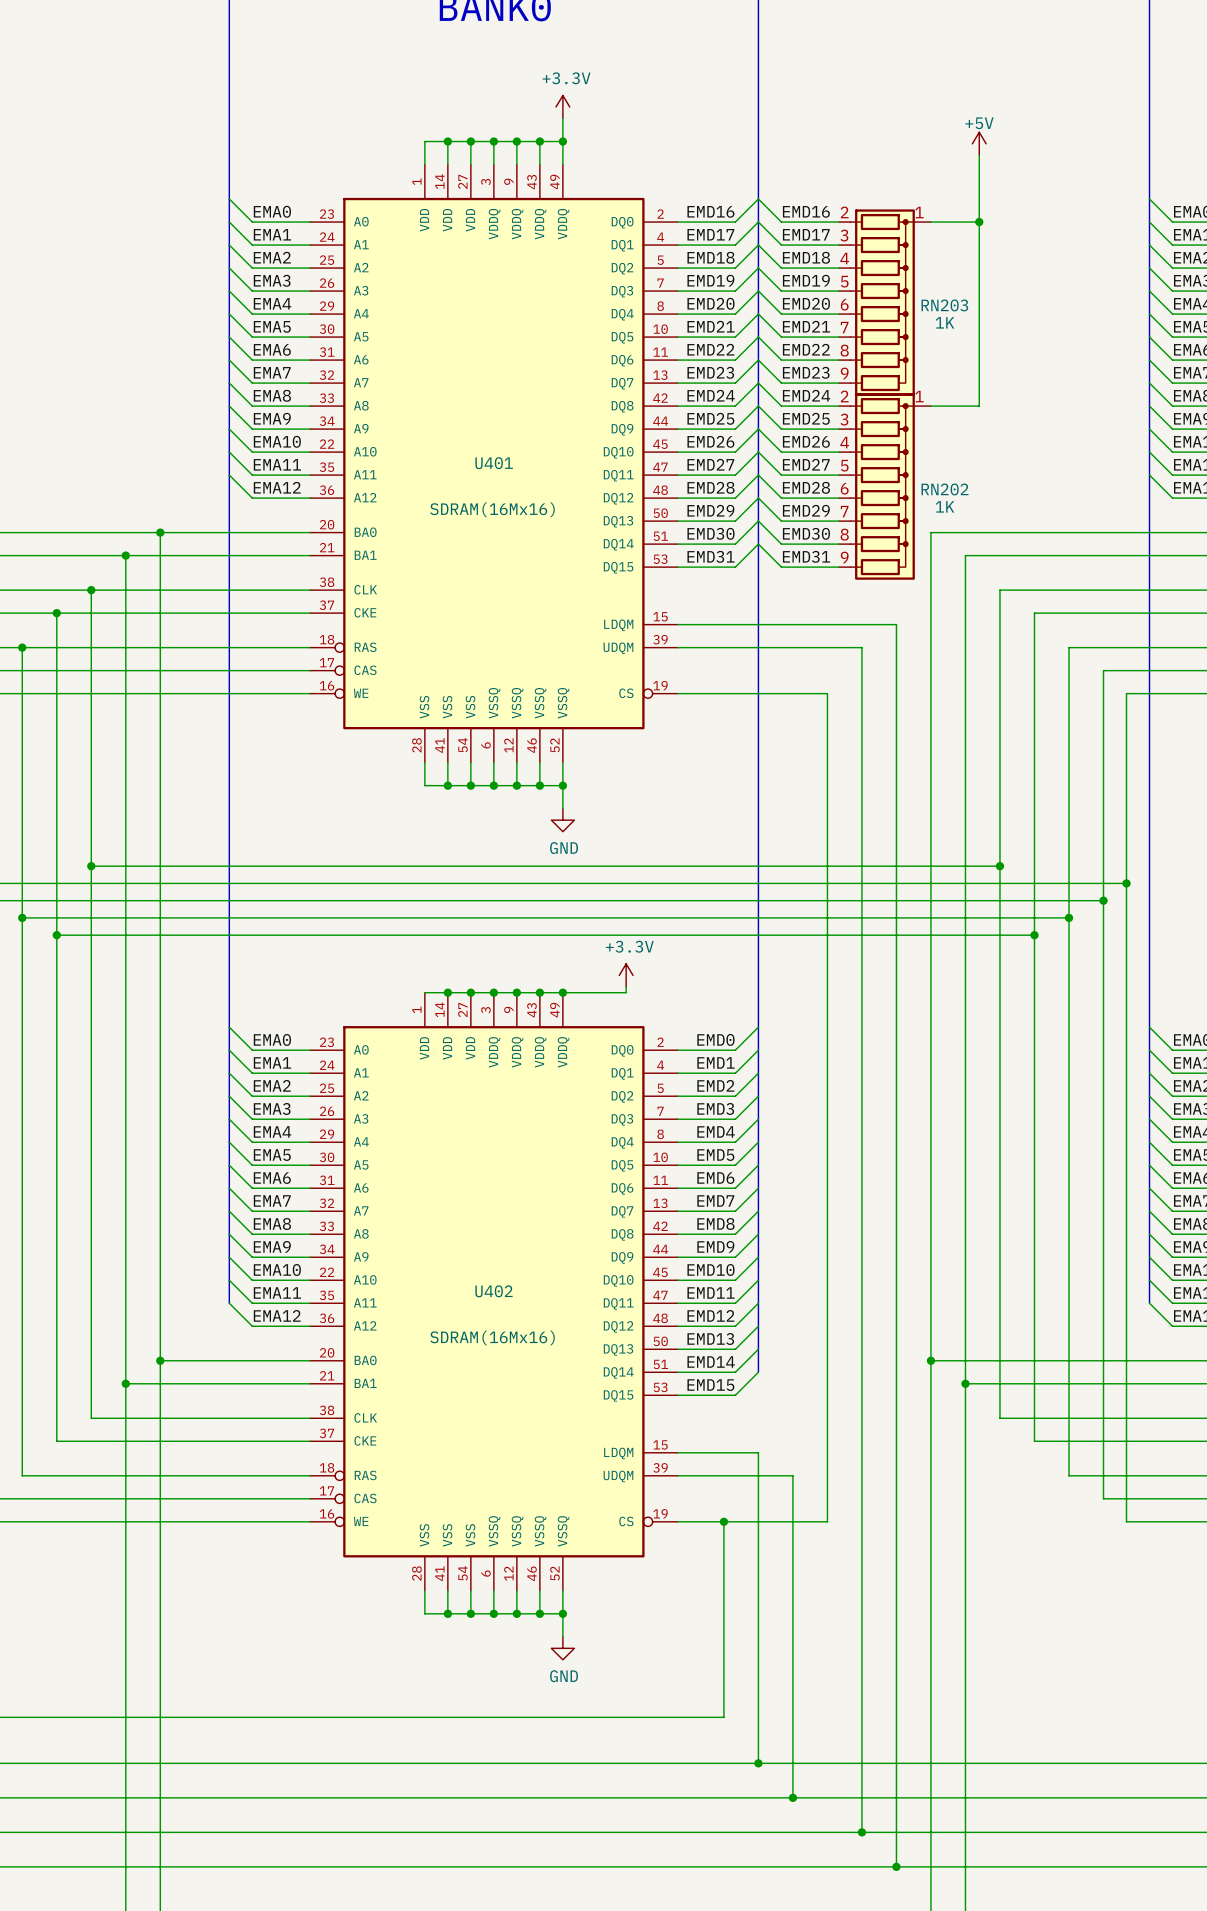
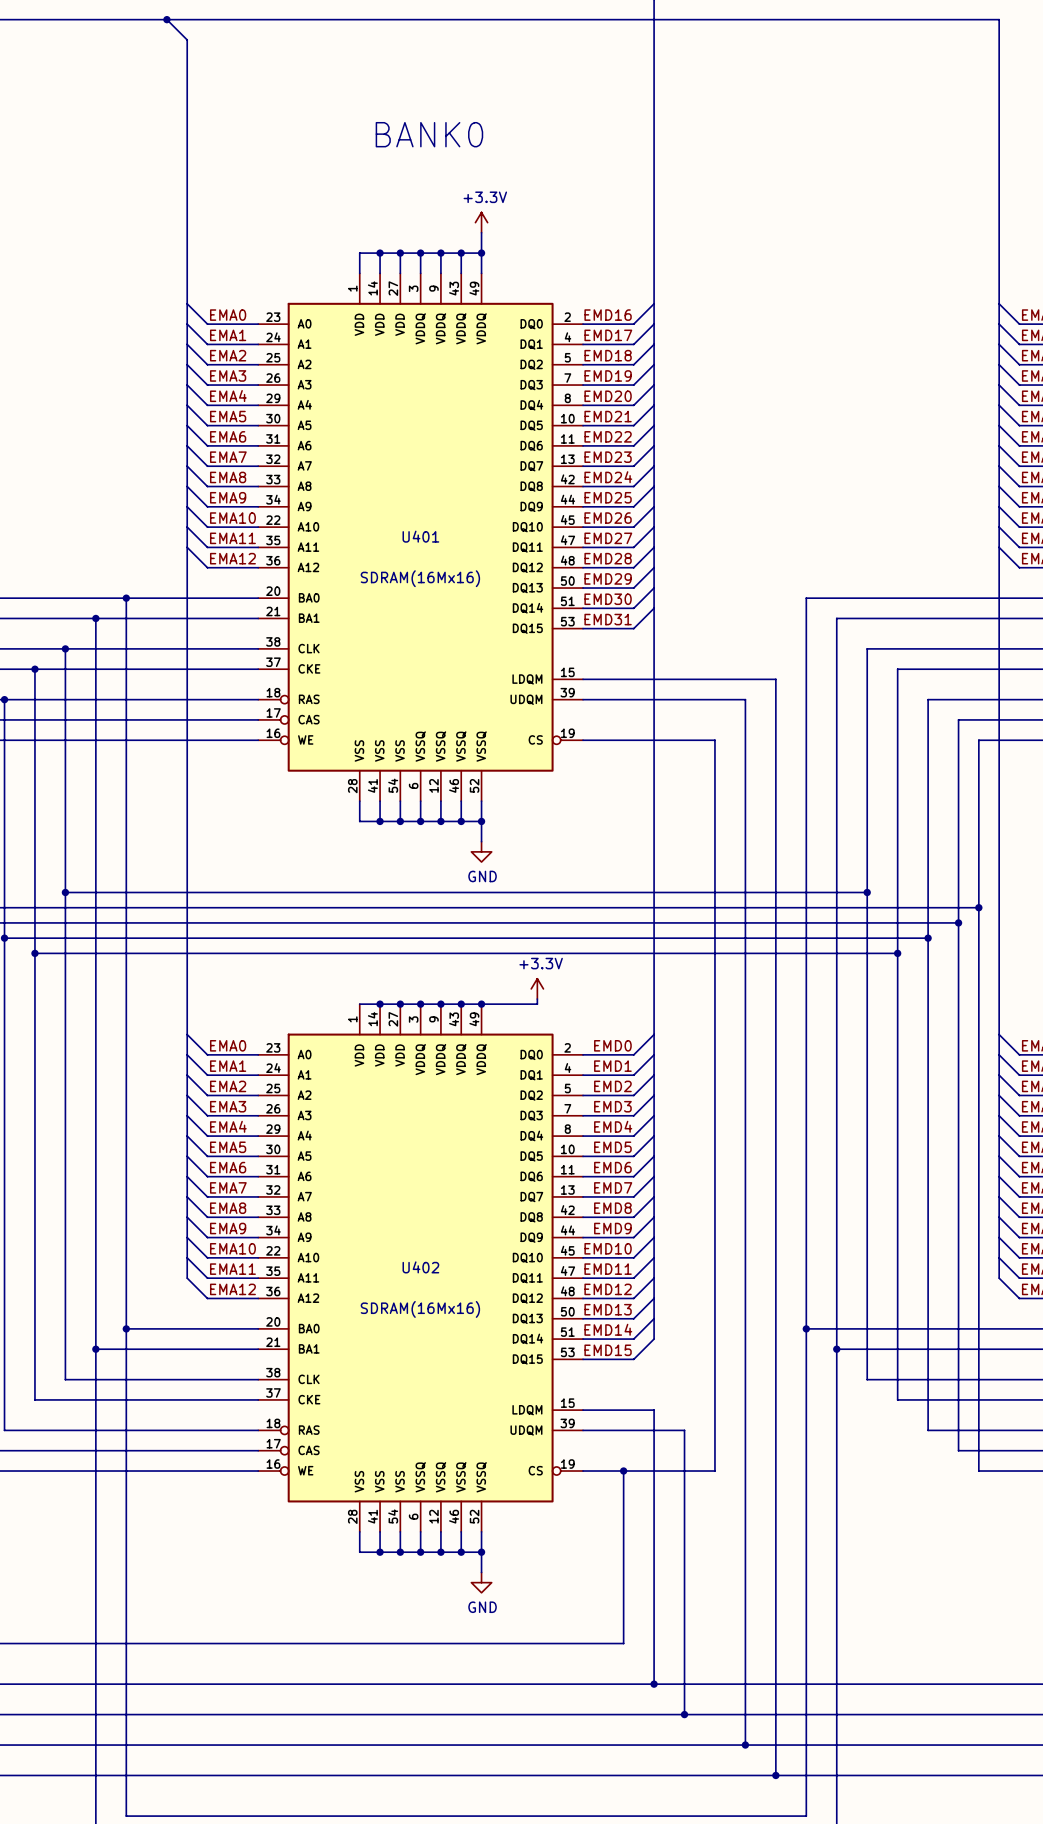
power symbol: +5V (979, 143) -> none
wire: (979, 155) (979, 406) (930, 406) -> none
wire: (758, 199) (781, 222) (838, 222) -> none
label: EMD16 (806, 211) -> none
wire: (758, 222) (781, 245) (838, 245) -> none
wire: (930, 222) (979, 222) -> none
junction: (979, 222) -> none
label: EMD17 (806, 234) -> none
wire: (758, 245) (781, 268) (838, 268) -> none
label: EMD18 (806, 257) -> none
wire: (758, 268) (781, 291) (838, 291) -> none
label: EMD19 (806, 280) -> none
wire: (758, 291) (781, 314) (838, 314) -> none
RN203: 1K (884, 302) -> none
label: EMD20 (806, 303) -> none
wire: (758, 314) (781, 337) (838, 337) -> none
label: EMD21 (806, 326) -> none
wire: (758, 337) (781, 360) (838, 360) -> none
label: EMD22 (806, 349) -> none
wire: (758, 360) (781, 383) (838, 383) -> none
label: EMD23 (806, 372) -> none
wire: (758, 383) (781, 406) (838, 406) -> none
label: EMD24 (806, 395) -> none
wire: (758, 406) (781, 429) (838, 429) -> none
label: EMD25 (806, 418) -> none
wire: (758, 429) (781, 452) (838, 452) -> none
label: EMD26 (806, 441) -> none
wire: (758, 452) (781, 475) (838, 475) -> none
label: EMD27 (806, 464) -> none
wire: (758, 475) (781, 498) (838, 498) -> none
RN202: 1K (884, 486) -> none
label: EMD28 (806, 487) -> none
wire: (758, 498) (781, 521) (838, 521) -> none
label: EMD29 (806, 510) -> none
wire: (758, 521) (781, 544) (838, 544) -> none
label: EMD30 (806, 533) -> none
wire: (758, 544) (781, 567) (838, 567) -> none
label: EMD31 (806, 556) -> none

